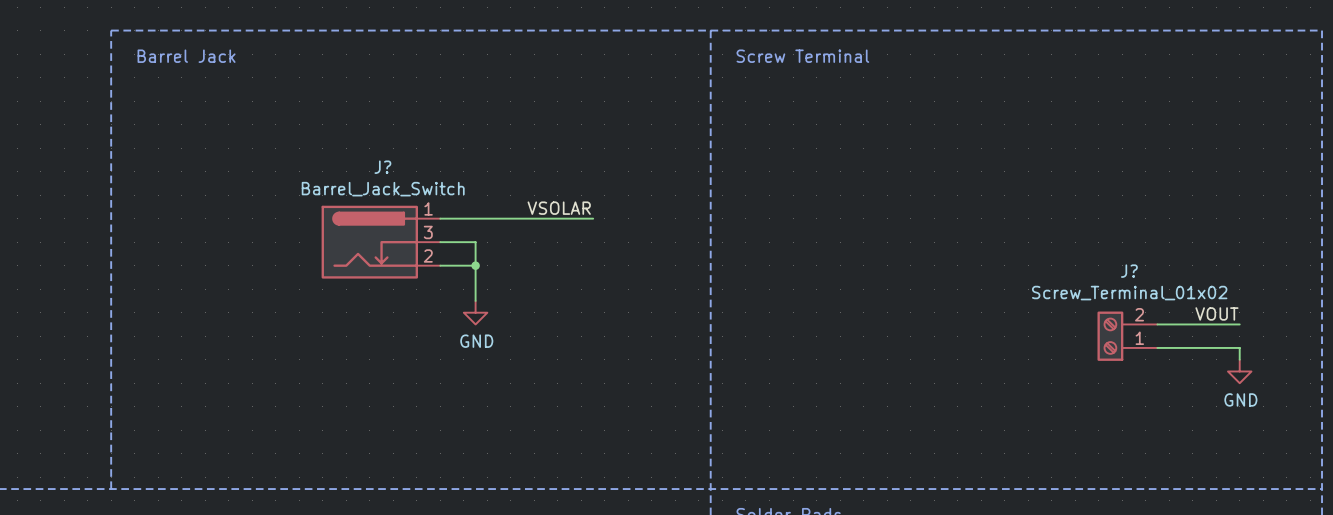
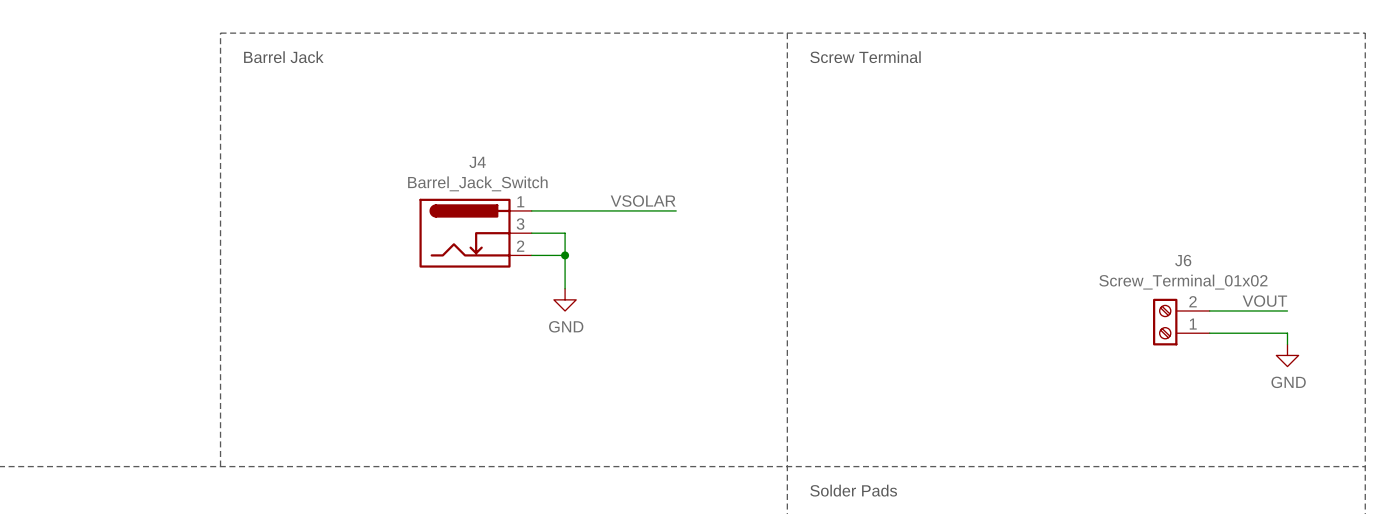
J? name: J? (382, 167) -> J4 (477, 162)
J? name: J? (1129, 271) -> J6 (1183, 260)

